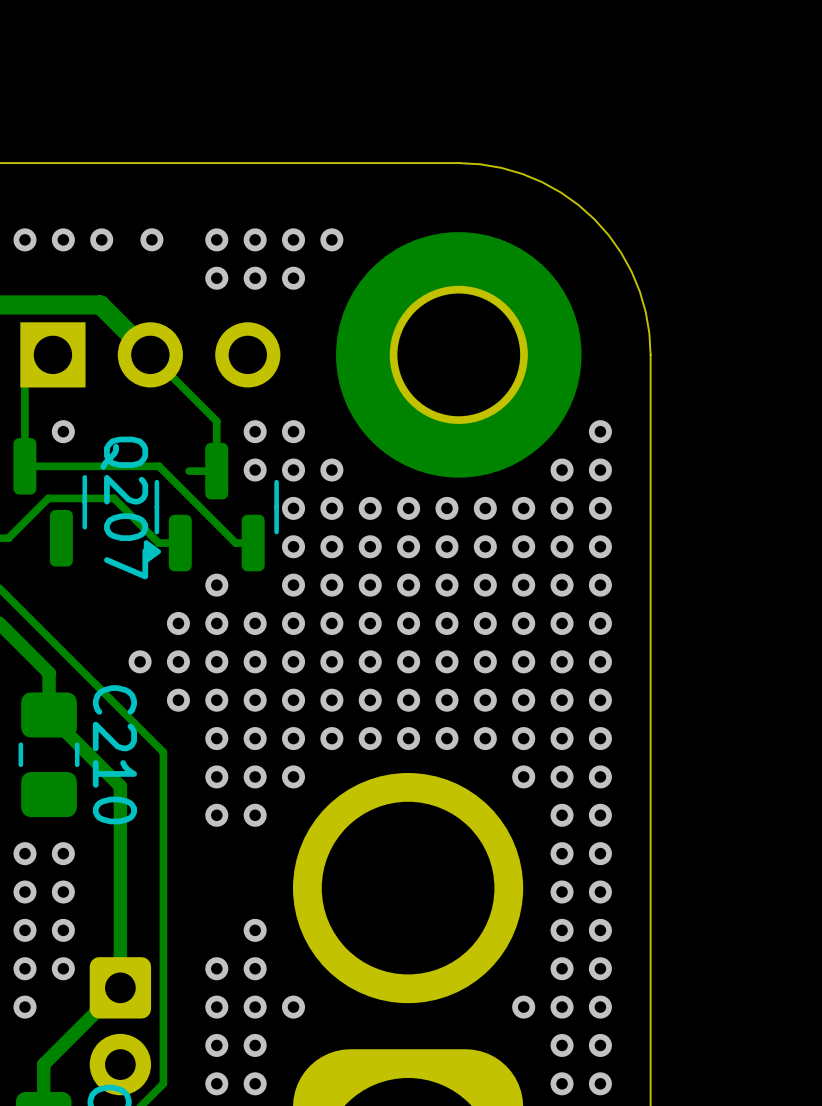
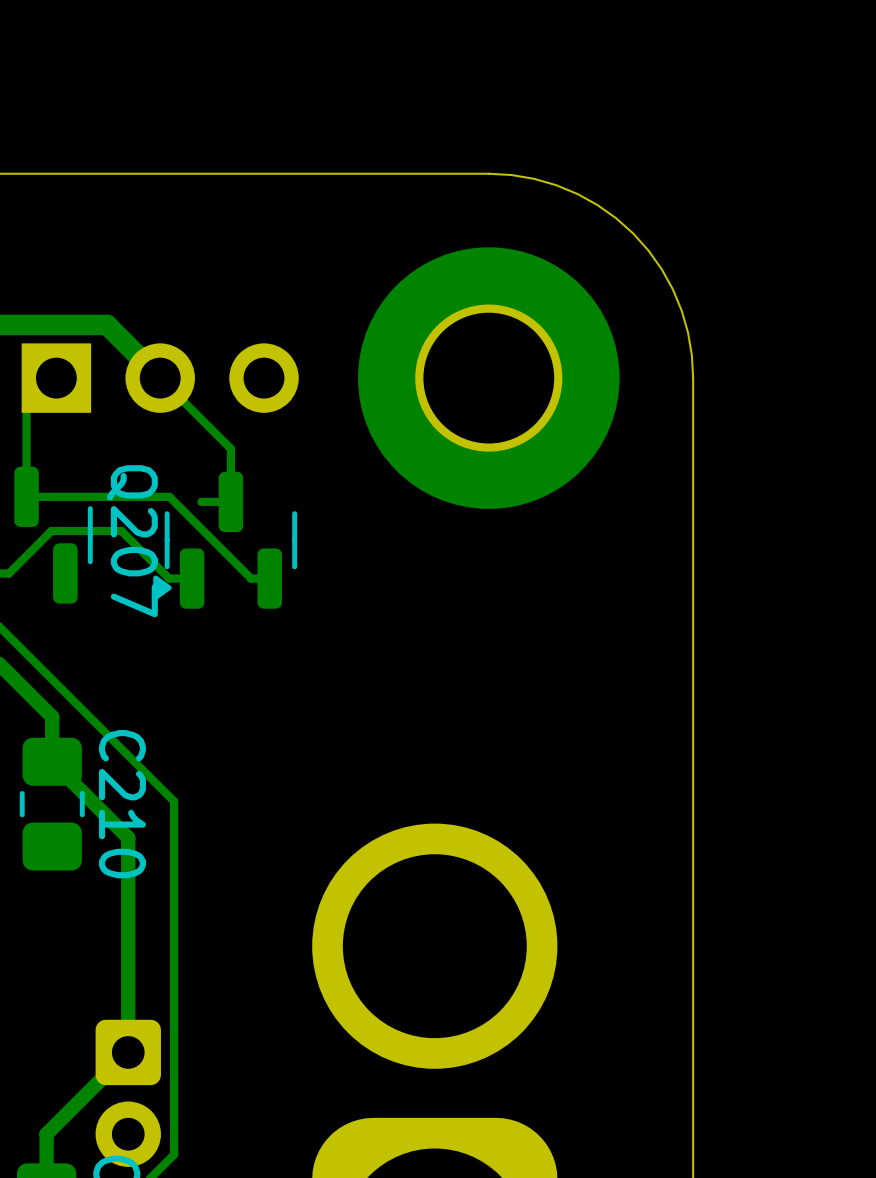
via: (24, 239) -> none
via: (63, 239) -> none
via: (101, 239) -> none
via: (151, 239) -> none
via: (216, 239) -> none
via: (255, 239) -> none
via: (293, 239) -> none
via: (331, 239) -> none
via: (216, 278) -> none
via: (255, 278) -> none
via: (293, 278) -> none
via: (63, 431) -> none
via: (255, 431) -> none
via: (293, 431) -> none
via: (600, 431) -> none
via: (255, 470) -> none
via: (293, 470) -> none
via: (331, 470) -> none
via: (562, 470) -> none
via: (600, 470) -> none
via: (293, 508) -> none
via: (331, 508) -> none
via: (370, 508) -> none
via: (408, 508) -> none
via: (446, 508) -> none
via: (485, 508) -> none
via: (523, 508) -> none
via: (562, 508) -> none
via: (600, 508) -> none
via: (293, 546) -> none
via: (331, 546) -> none
via: (370, 546) -> none
via: (408, 546) -> none
via: (446, 546) -> none
via: (485, 546) -> none
via: (523, 546) -> none
via: (562, 546) -> none
via: (600, 546) -> none
via: (216, 585) -> none
via: (293, 585) -> none
via: (331, 585) -> none
via: (370, 585) -> none
via: (408, 585) -> none
via: (446, 585) -> none
via: (485, 585) -> none
via: (523, 585) -> none
via: (562, 585) -> none
via: (600, 585) -> none
via: (178, 623) -> none
via: (216, 623) -> none
via: (255, 623) -> none
via: (293, 623) -> none
via: (331, 623) -> none
via: (370, 623) -> none
via: (408, 623) -> none
via: (446, 623) -> none
via: (485, 623) -> none
via: (523, 623) -> none
via: (562, 623) -> none
via: (600, 623) -> none
via: (140, 661) -> none
via: (178, 661) -> none
via: (216, 661) -> none
via: (255, 661) -> none
via: (293, 661) -> none
via: (331, 661) -> none
via: (370, 661) -> none
via: (408, 661) -> none
via: (446, 661) -> none
via: (485, 661) -> none
via: (523, 661) -> none
via: (562, 661) -> none
via: (600, 661) -> none
via: (178, 700) -> none
via: (216, 700) -> none
via: (255, 700) -> none
via: (293, 700) -> none
via: (331, 700) -> none
via: (370, 700) -> none
via: (408, 700) -> none
via: (446, 700) -> none
via: (485, 700) -> none
via: (523, 700) -> none
via: (562, 700) -> none
via: (600, 700) -> none
via: (216, 738) -> none
via: (255, 738) -> none
via: (293, 738) -> none
via: (331, 738) -> none
via: (370, 738) -> none
via: (408, 738) -> none
via: (446, 738) -> none
via: (485, 738) -> none
via: (523, 738) -> none
via: (562, 738) -> none
via: (600, 738) -> none
via: (216, 776) -> none
via: (255, 776) -> none
via: (293, 776) -> none
via: (523, 776) -> none
via: (562, 776) -> none
via: (600, 776) -> none
via: (216, 815) -> none
via: (255, 815) -> none
via: (562, 815) -> none
via: (600, 815) -> none
via: (24, 853) -> none
via: (63, 853) -> none
via: (562, 853) -> none
via: (600, 853) -> none
via: (24, 892) -> none
via: (63, 892) -> none
via: (562, 892) -> none
via: (600, 892) -> none
via: (24, 930) -> none
via: (63, 930) -> none
via: (255, 930) -> none
via: (562, 930) -> none
via: (600, 930) -> none
via: (24, 968) -> none
via: (63, 968) -> none
via: (216, 968) -> none
via: (255, 968) -> none
via: (562, 968) -> none
via: (600, 968) -> none
via: (24, 1007) -> none
via: (216, 1007) -> none
via: (255, 1007) -> none
via: (293, 1007) -> none
via: (523, 1007) -> none
via: (562, 1007) -> none
via: (600, 1007) -> none
via: (216, 1045) -> none
via: (255, 1045) -> none
via: (562, 1045) -> none
via: (600, 1045) -> none
via: (216, 1083) -> none
via: (255, 1083) -> none
via: (562, 1083) -> none
via: (600, 1083) -> none

